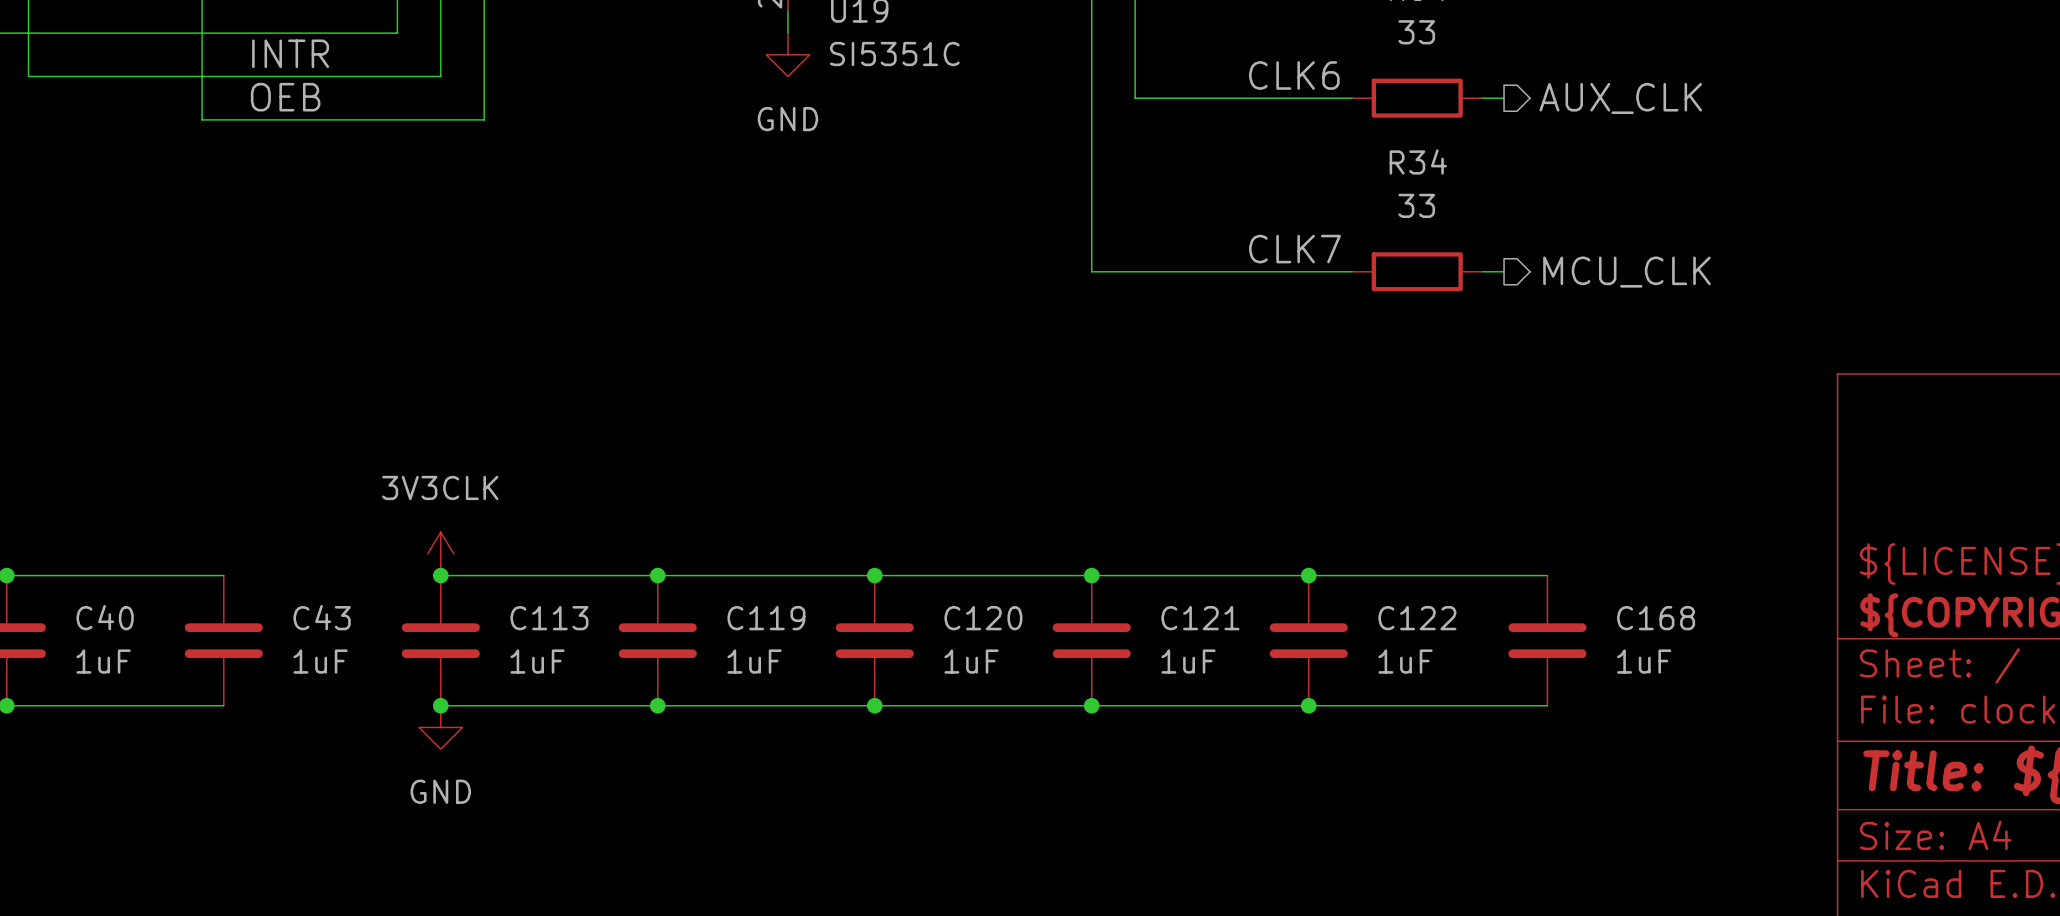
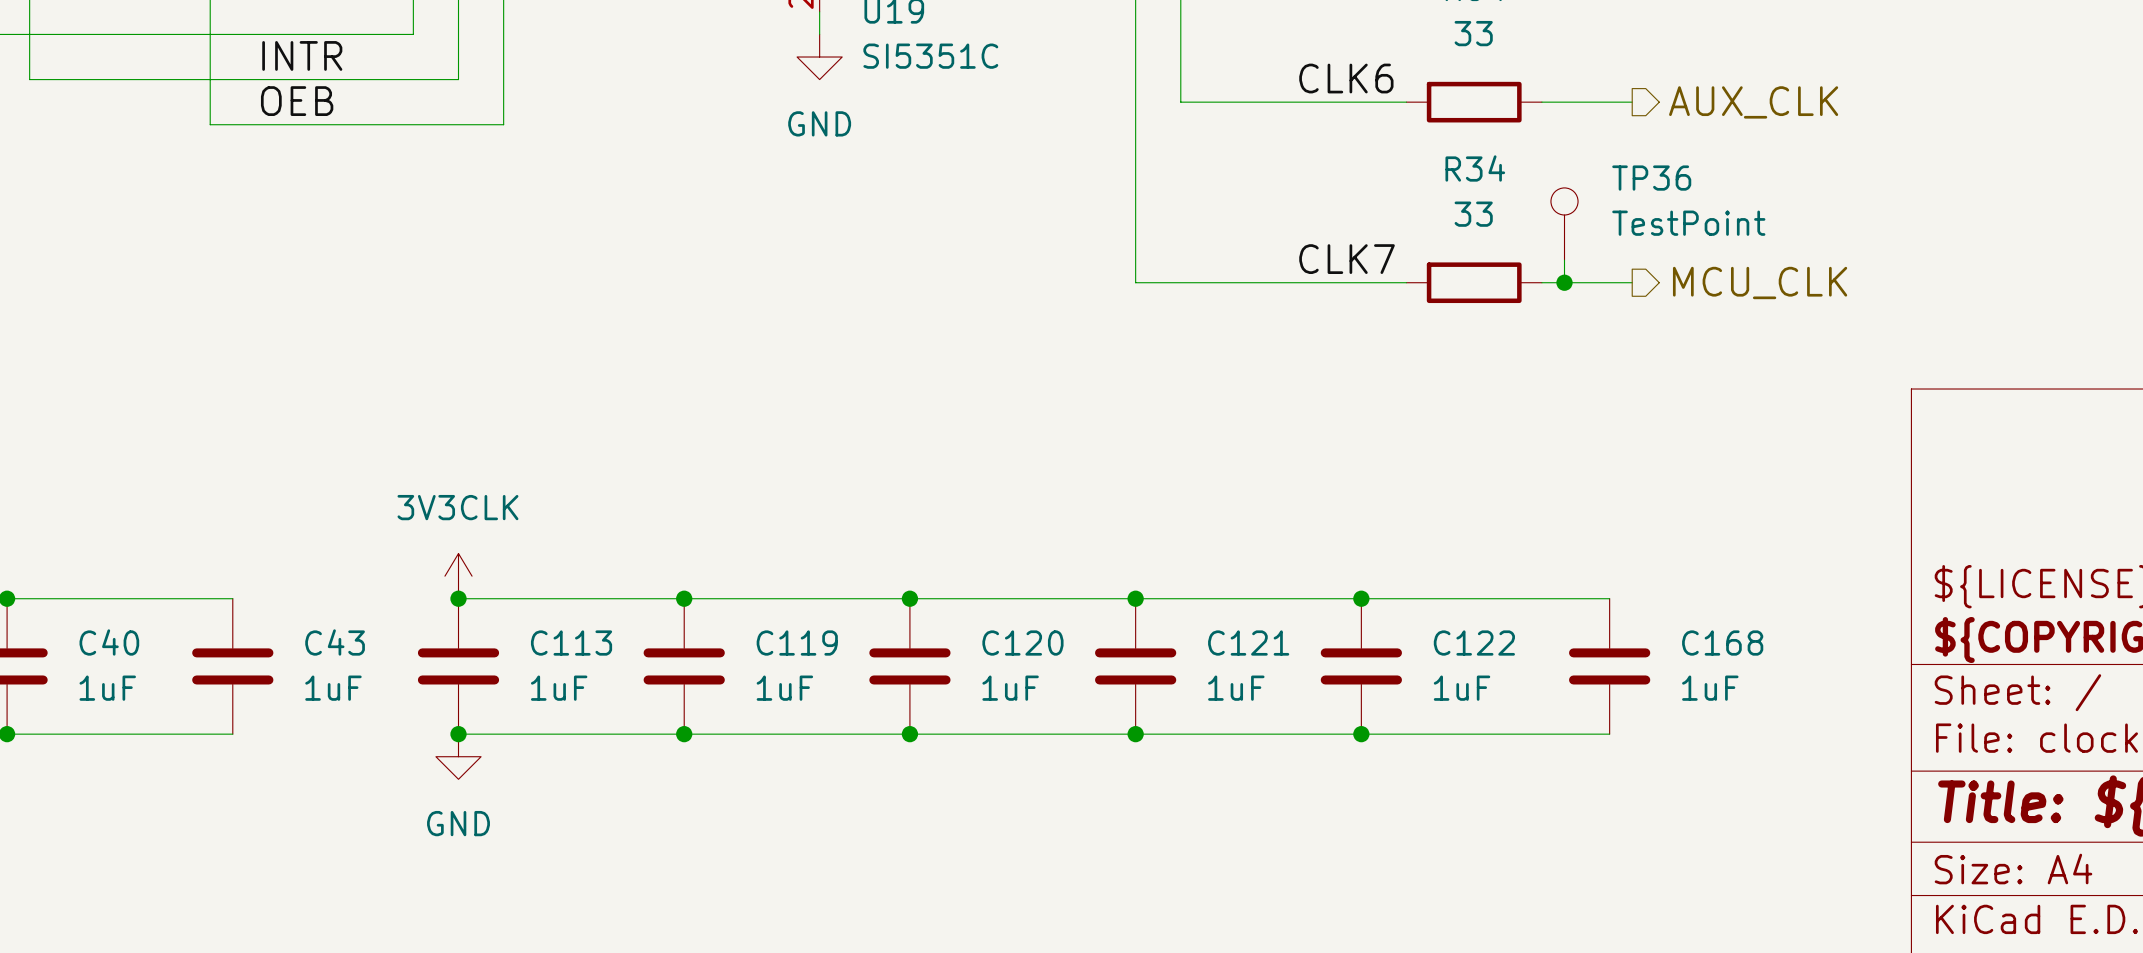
wire: none -> (1564, 102) (1632, 102)
hierarchical label position: AUX_CLK (1620, 98) -> AUX_CLK (1753, 102)
TP36: none -> TestPoint (1564, 224)
wire: none -> (1564, 260) (1564, 282) (1632, 282)
junction: none -> (1564, 282)
hierarchical label position: MCU_CLK (1626, 272) -> MCU_CLK (1760, 283)

